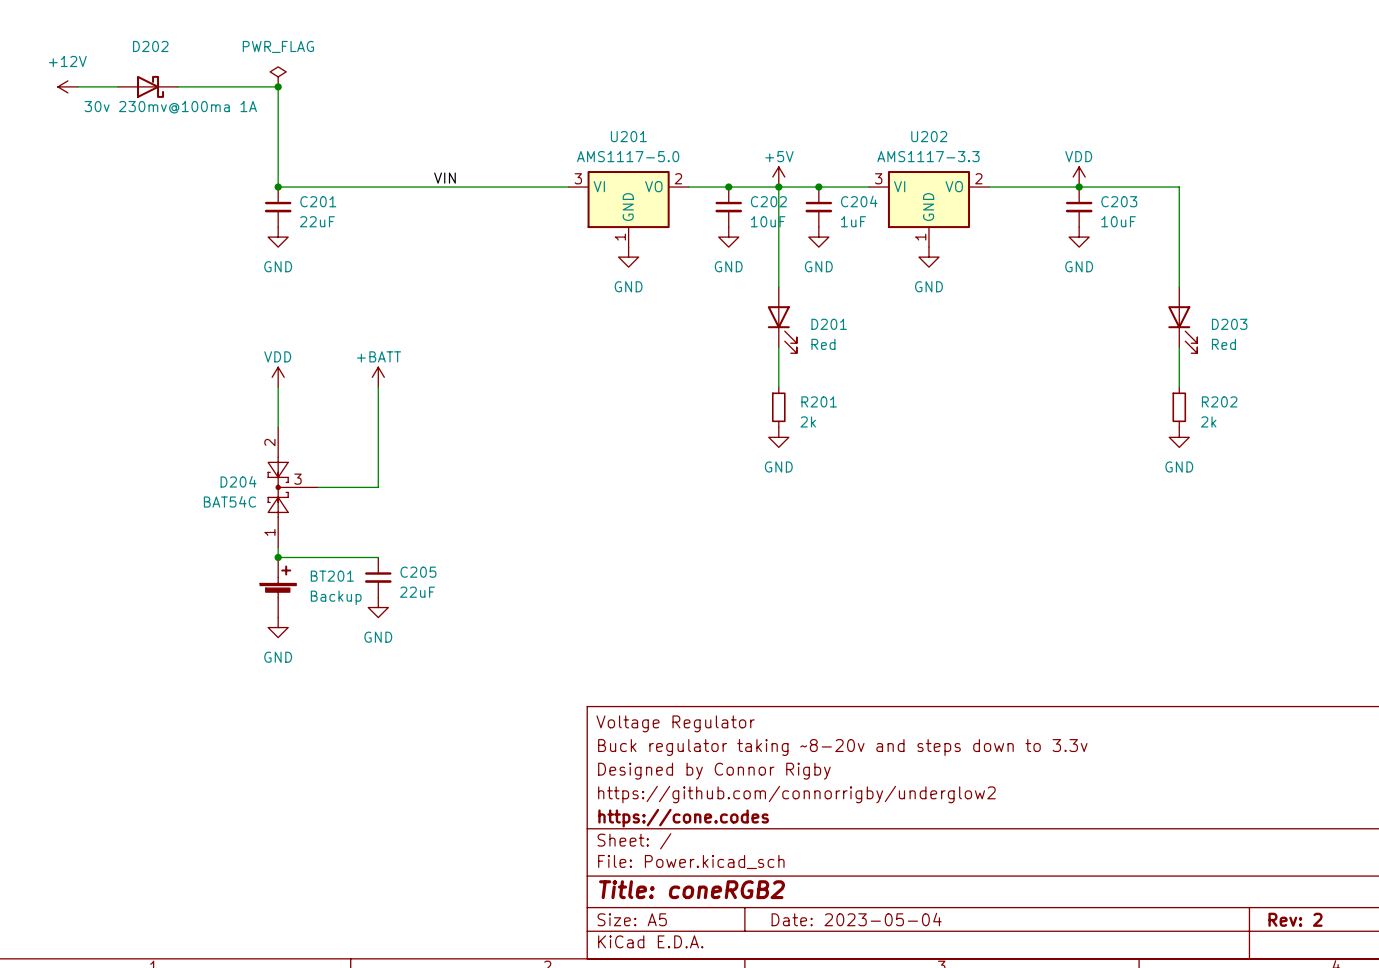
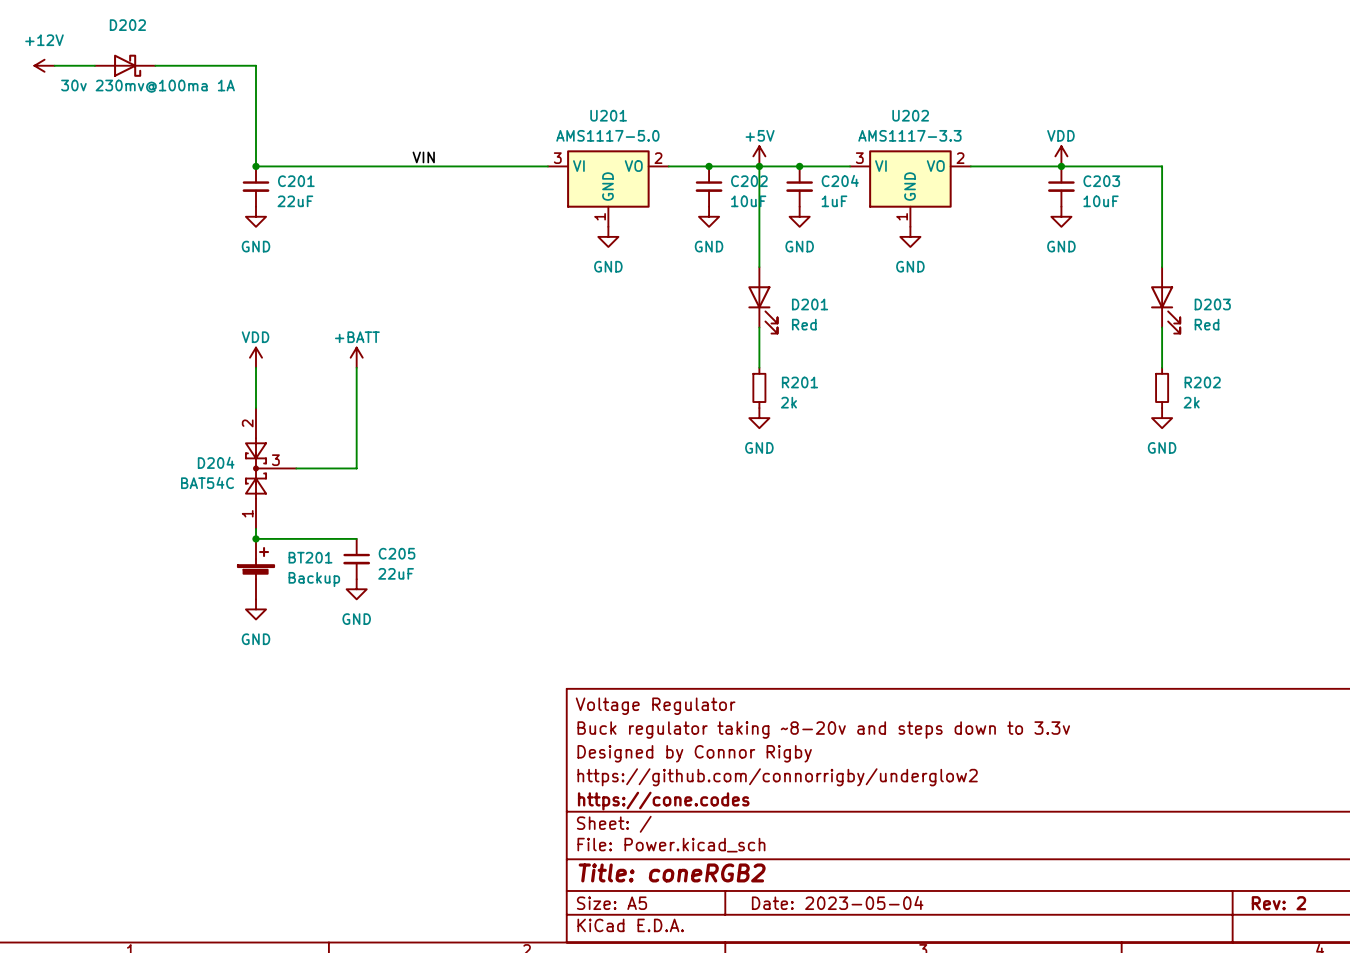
power symbol: PWR_FLAG (278, 76) -> none
junction: (278, 86) -> none

